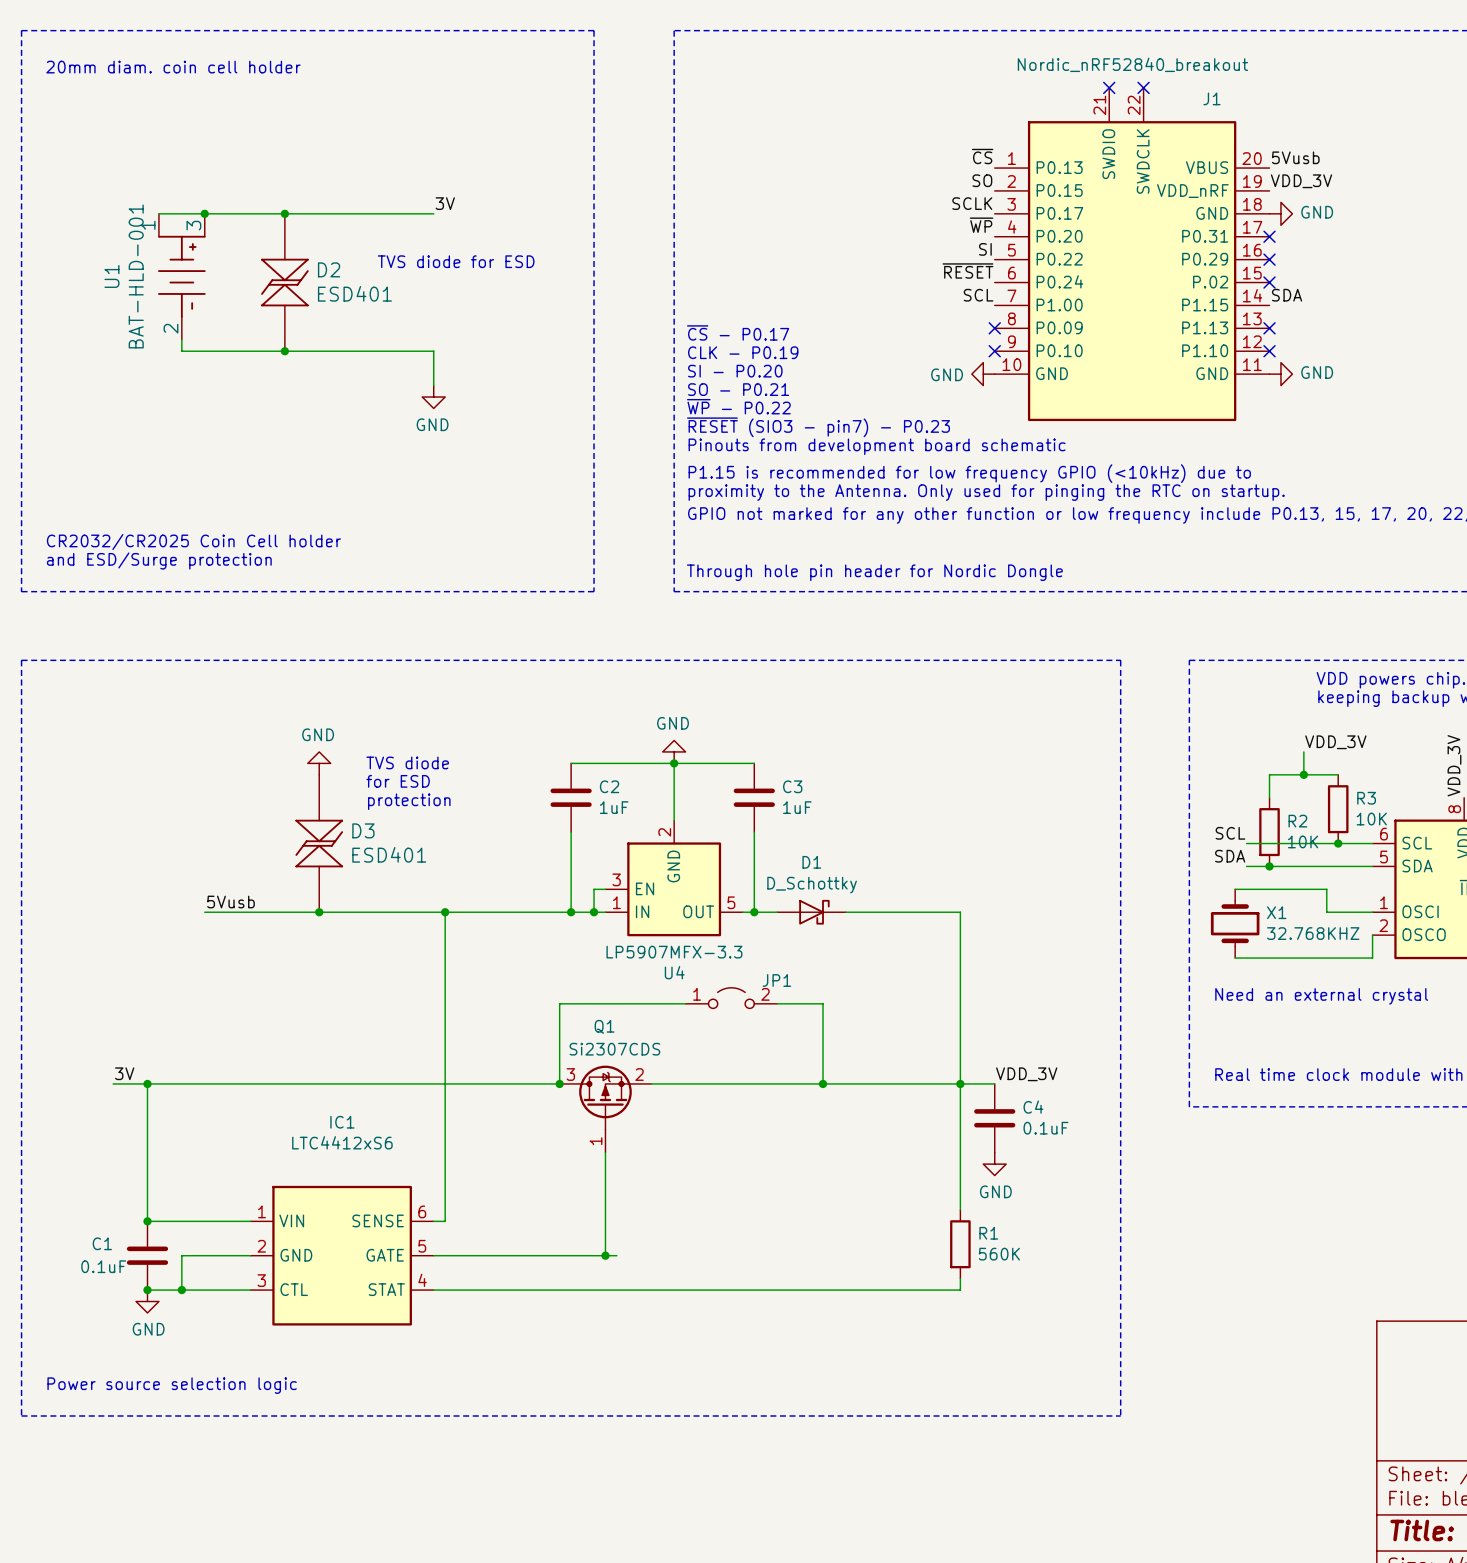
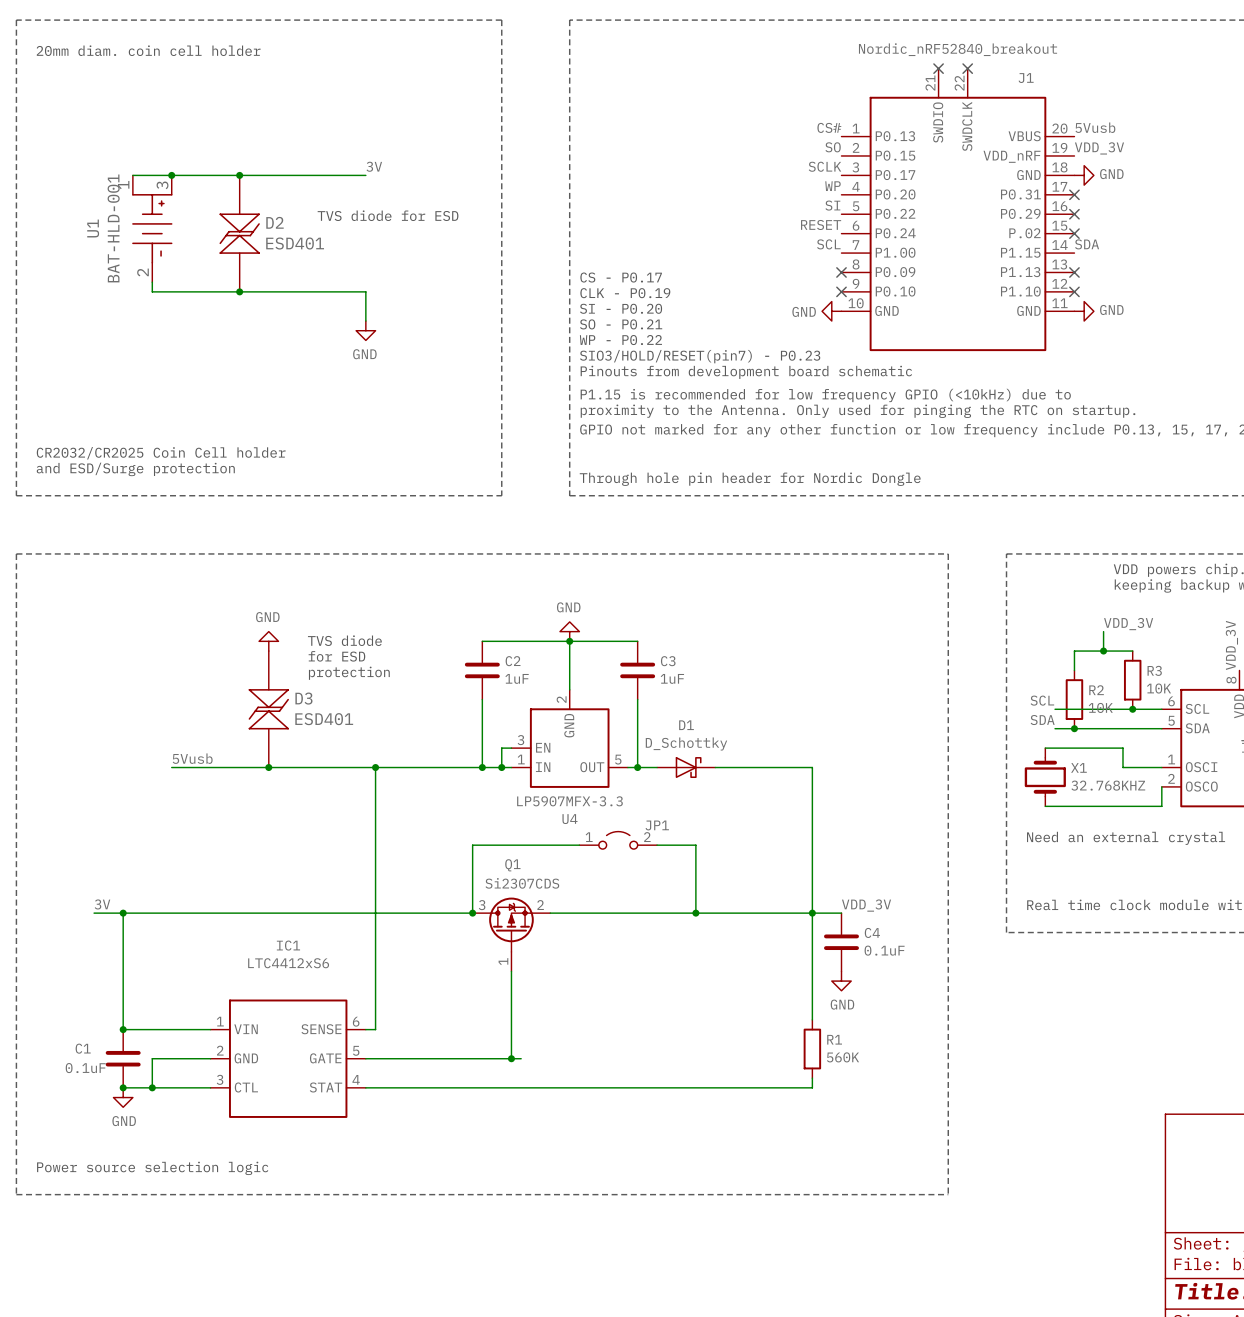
label: ~{CS} (982, 156) -> CS# (829, 127)
label: ~{WP} (981, 225) -> WP (832, 186)
label: ~{RESET} (967, 270) -> RESET (821, 224)
text: ~{CS} - P0.17 (738, 332) -> CS - P0.17 (621, 277)
text: ~{WP} - P0.22 (738, 406) -> WP - P0.22 (620, 340)
text: ~{RESET} (SIO3 - pin7) - P0.23 (818, 427) -> SIO3/HOLD/RESET(pin7) - P0.23 (700, 356)

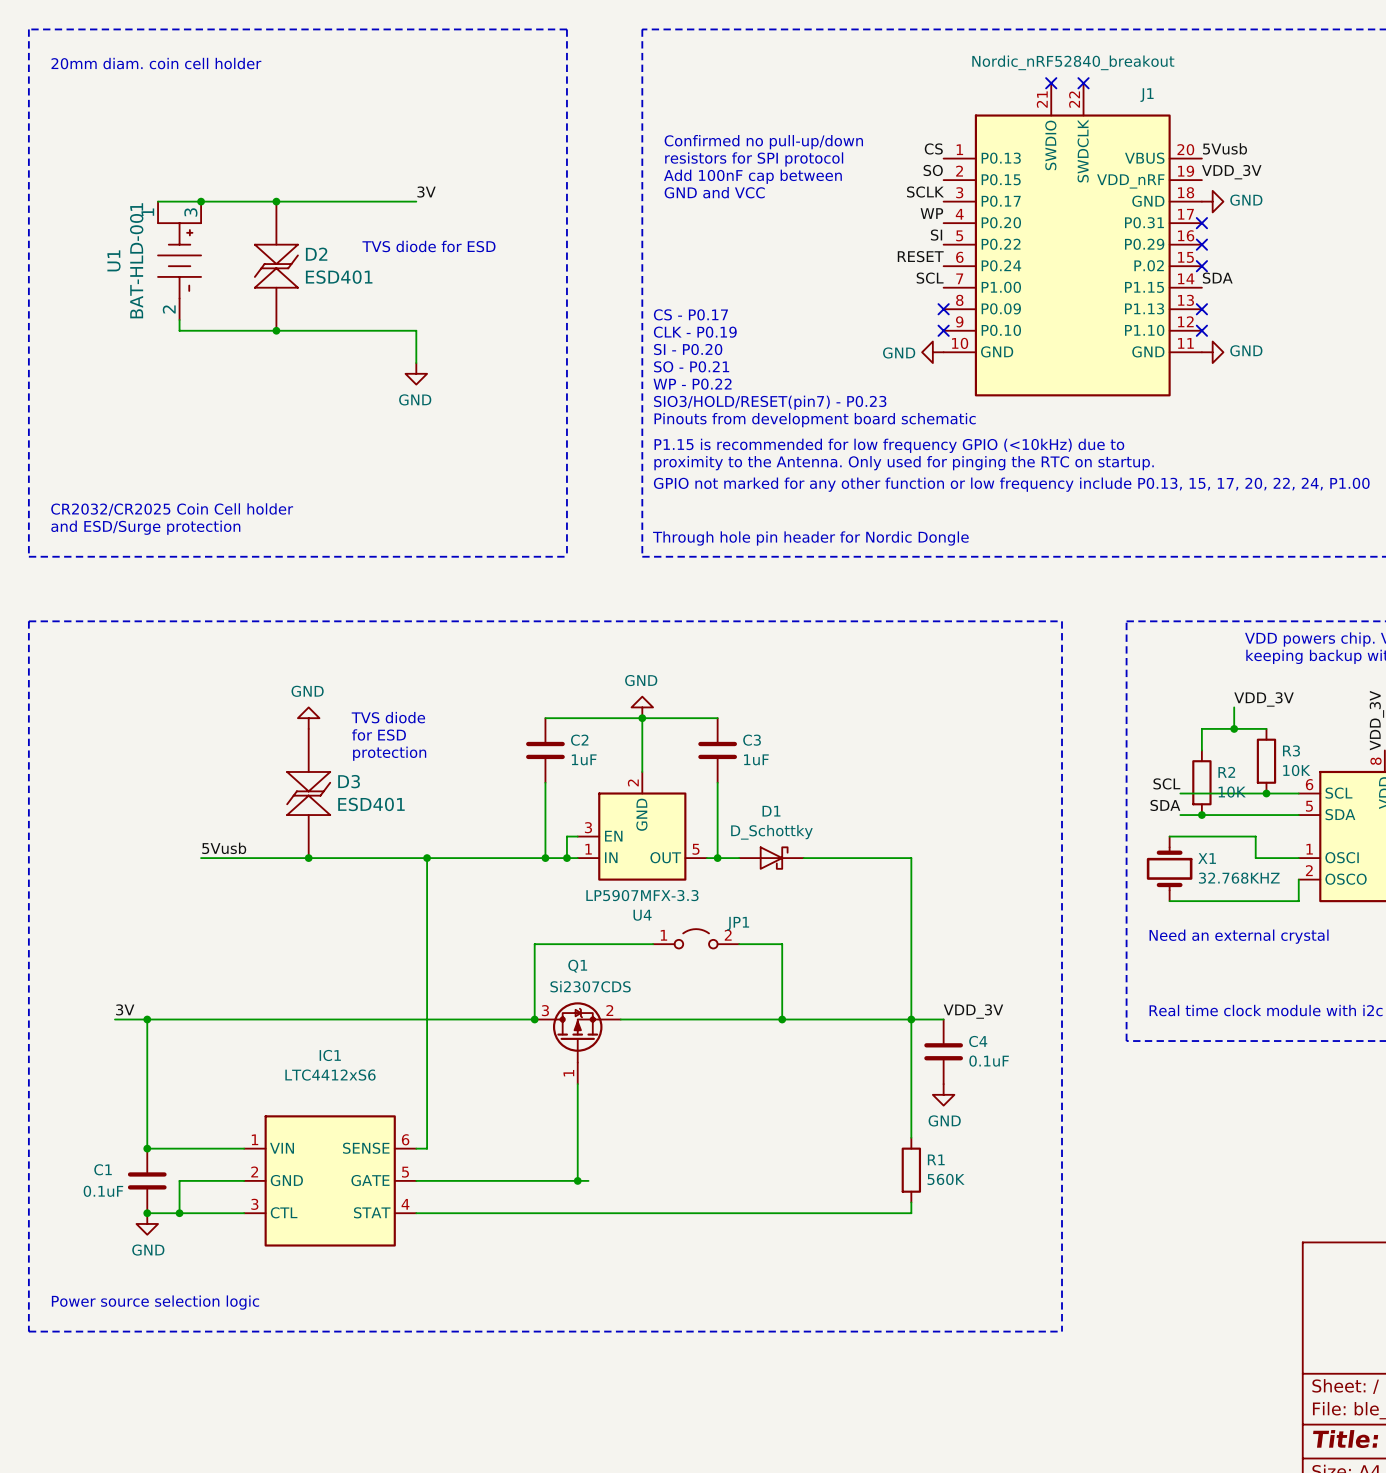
text: none -> Confirmed no pull-up/down (763, 142)
label: CS# (829, 127) -> CS (933, 148)
text: none -> resistors for SPI protocol (754, 159)
text: none -> Add 100nF cap between (752, 176)
text: none -> GND and VCC (714, 192)

